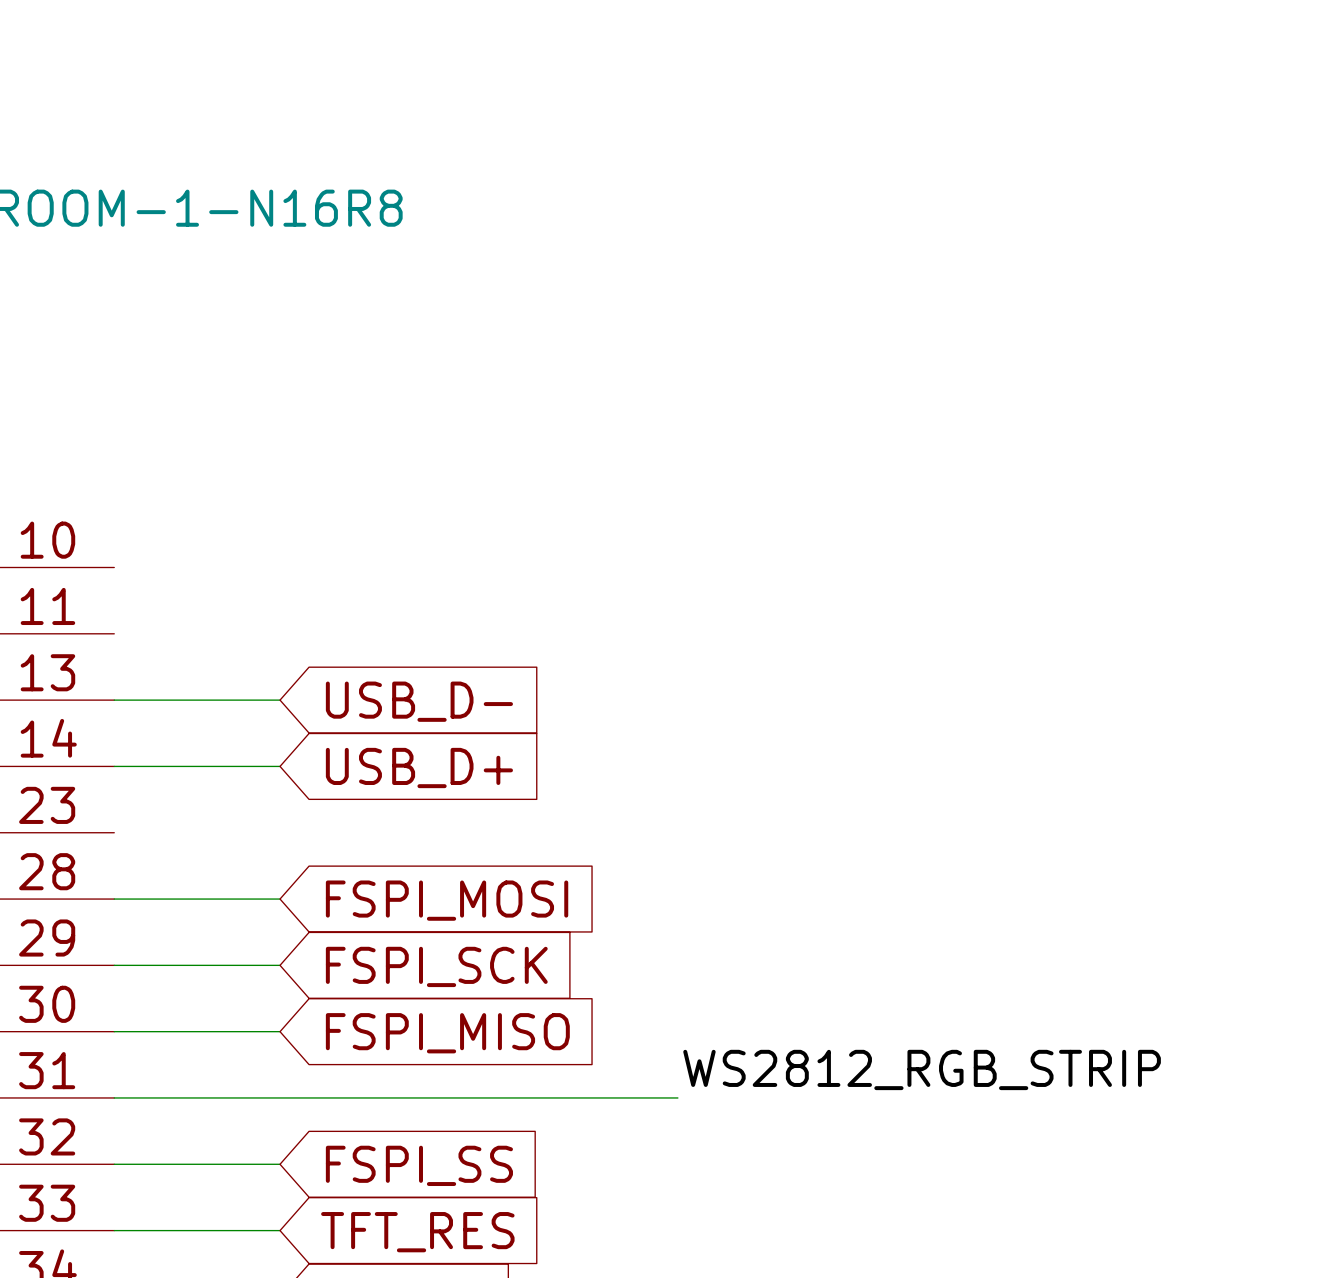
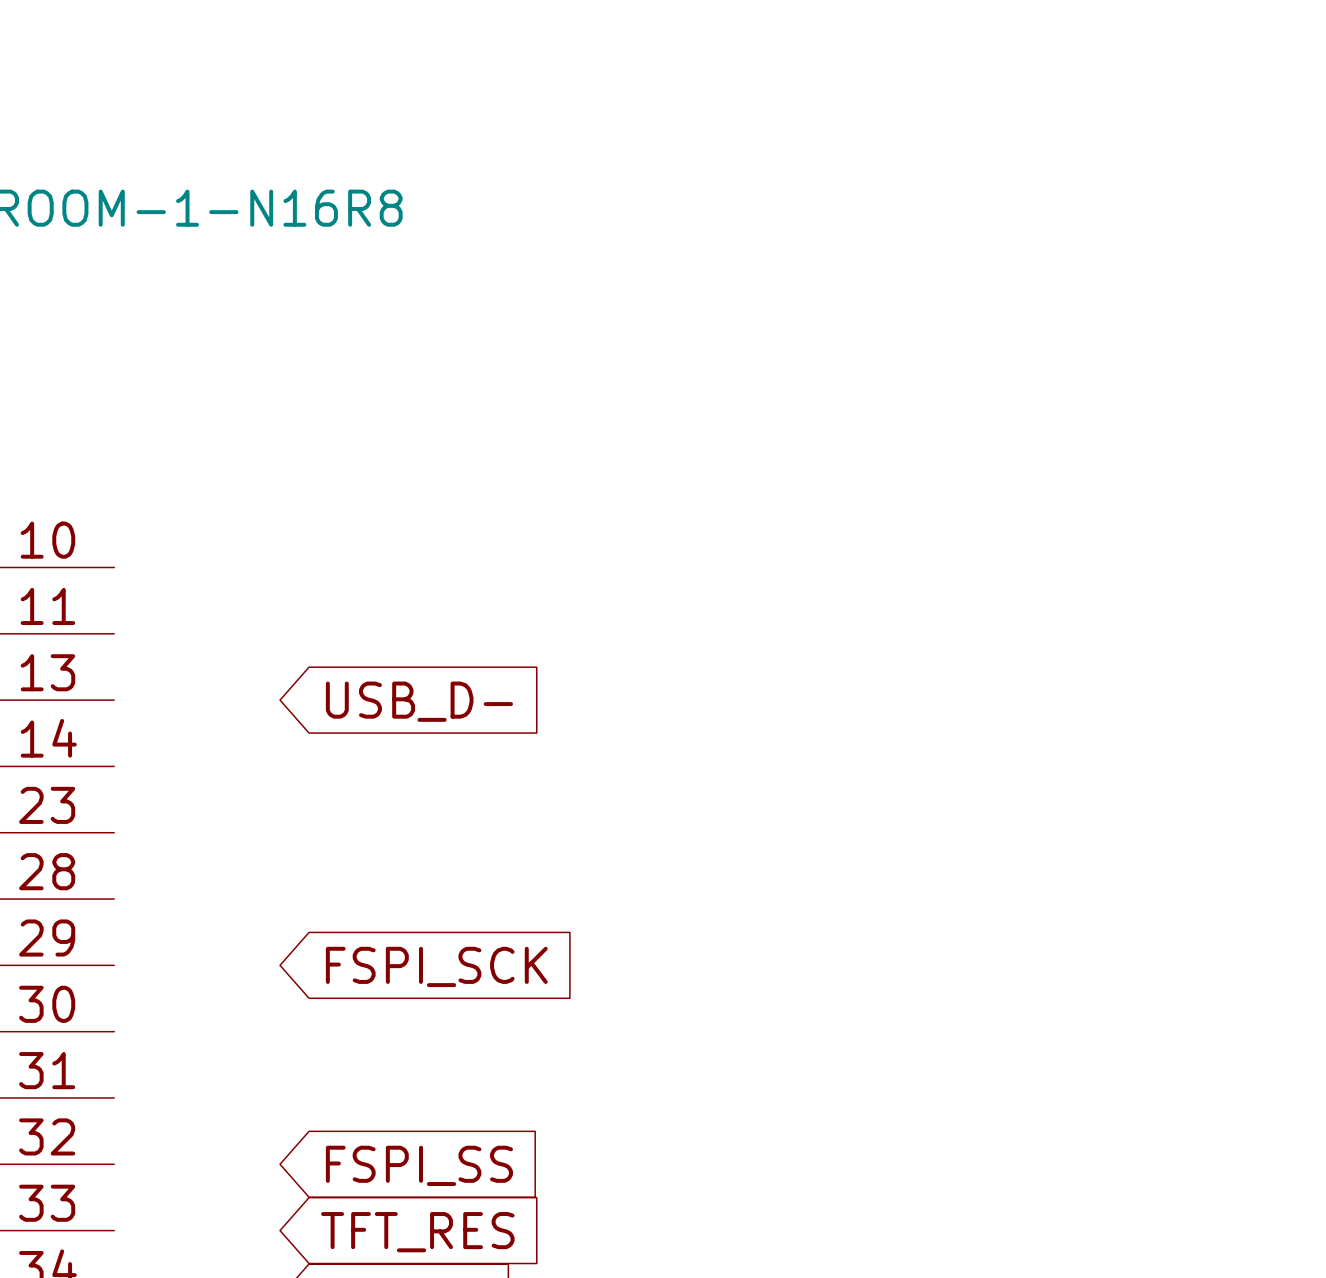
wire: (114, 700) (280, 700) -> none
wire: (114, 766) (280, 766) -> none
global label: USB_D+ (419, 768) -> none
wire: (114, 899) (280, 899) -> none
global label: FSPI_MOSI (447, 900) -> none
wire: (114, 965) (280, 965) -> none
wire: (114, 1031) (280, 1031) -> none
global label: FSPI_MISO (447, 1033) -> none
label: WS2812_RGB_STRIP (922, 1069) -> none
wire: (114, 1097) (677, 1097) -> none
wire: (114, 1164) (280, 1164) -> none
wire: (114, 1230) (280, 1230) -> none

